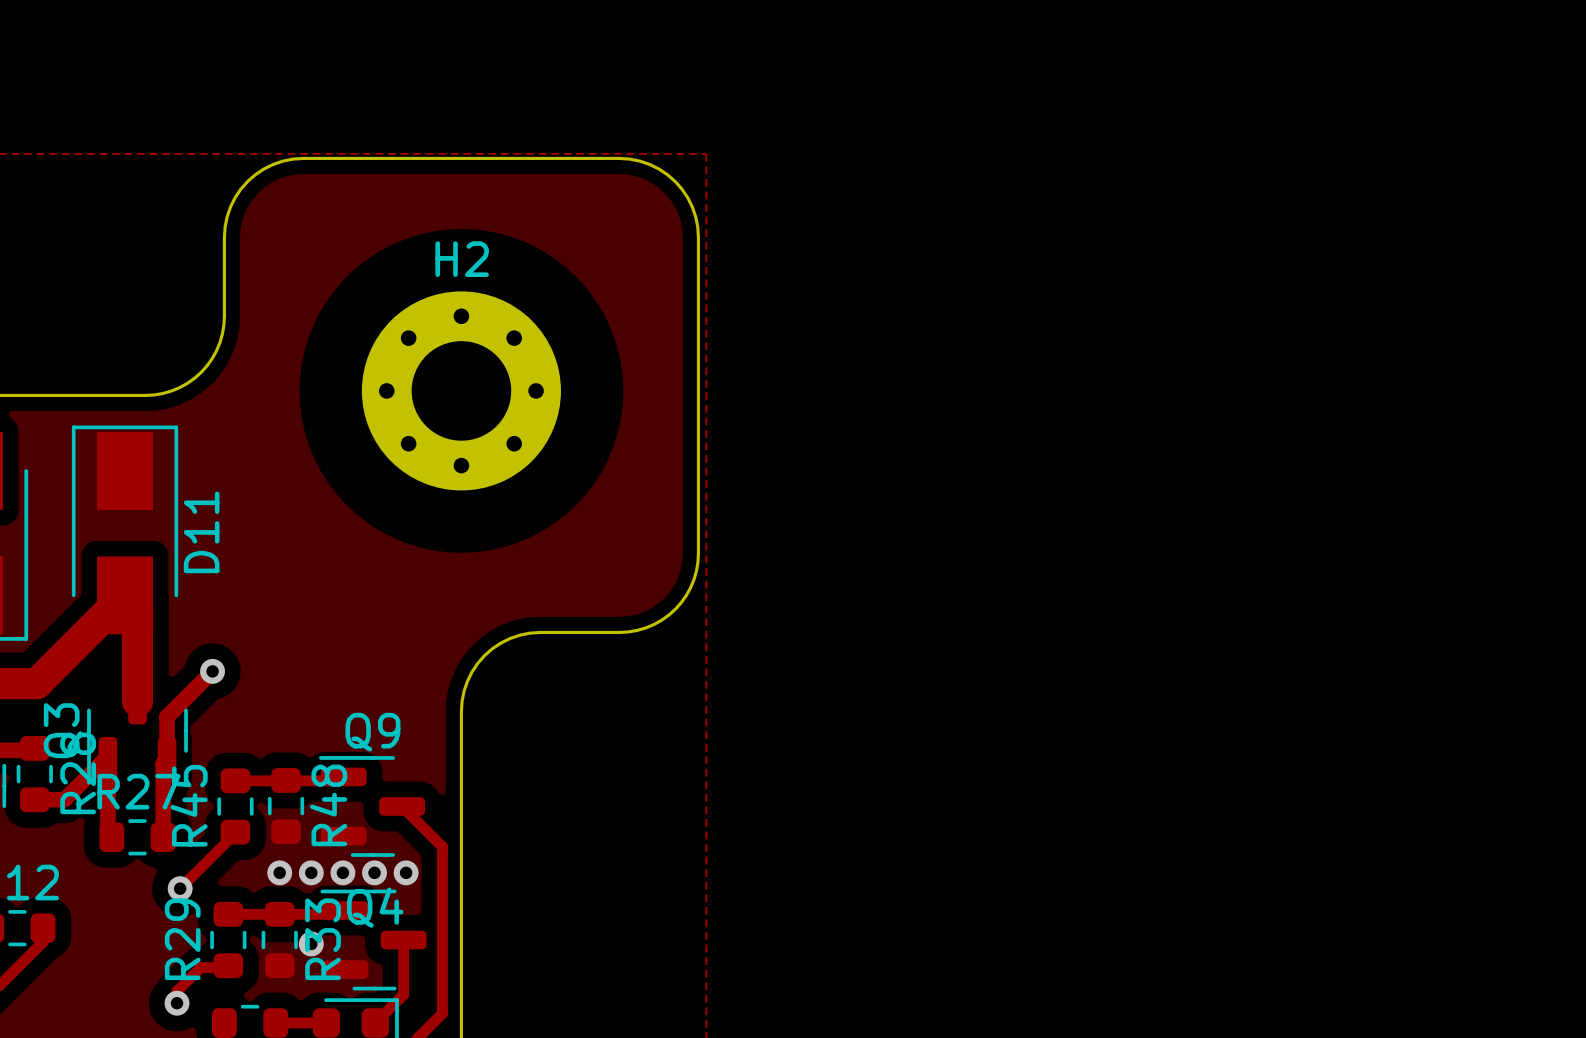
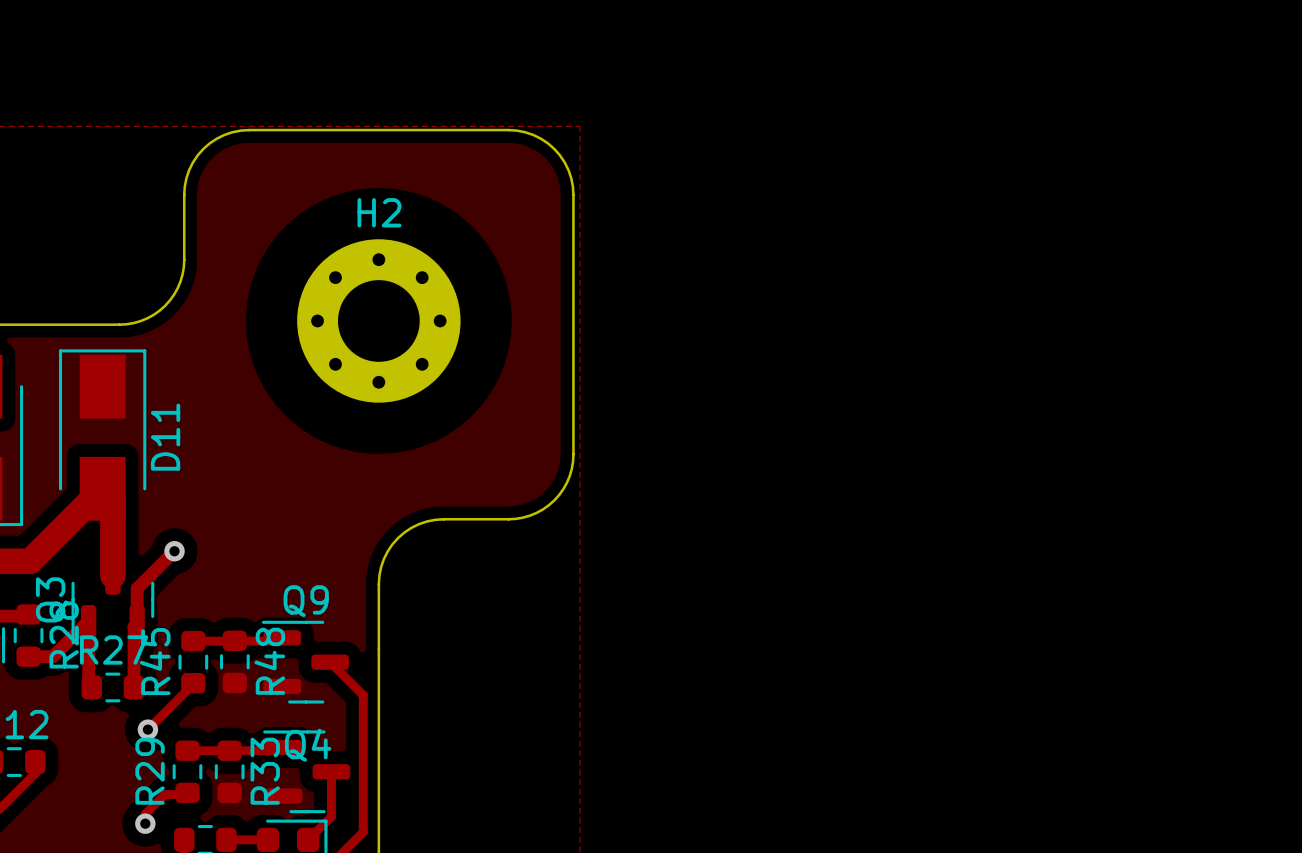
via: (279, 872) -> none
via: (311, 872) -> none
via: (342, 872) -> none
via: (374, 872) -> none
via: (406, 872) -> none
via: (311, 943) -> none

